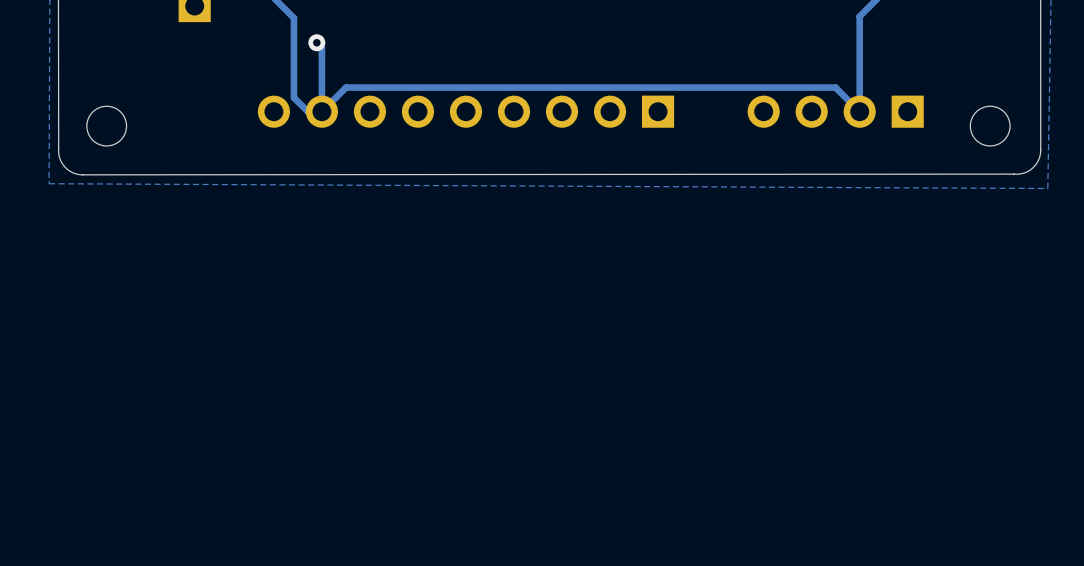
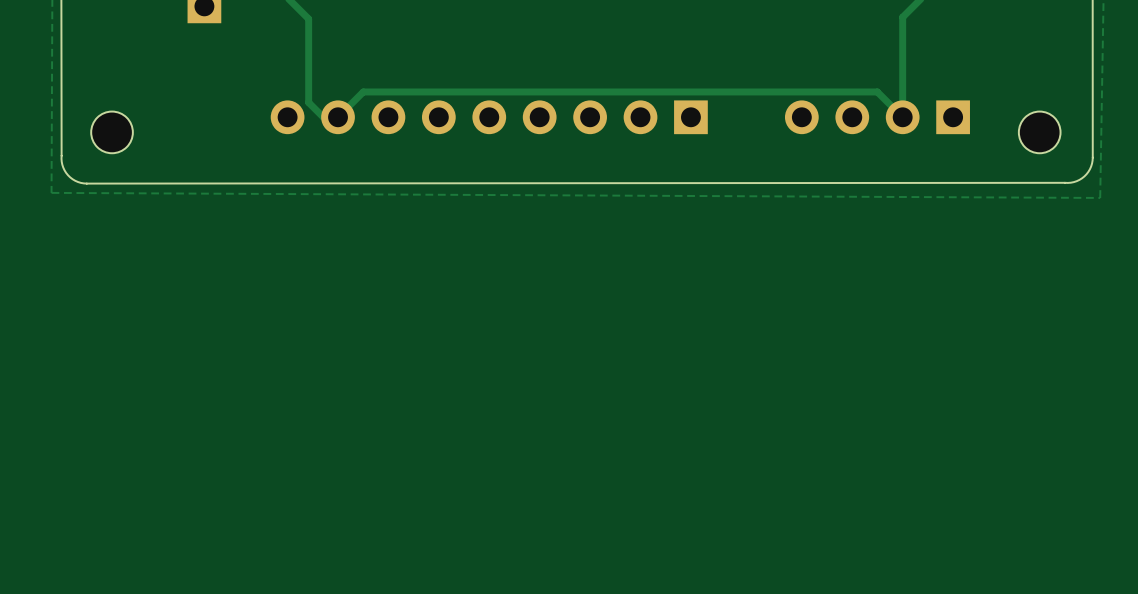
track: (316, 42) (321, 47) (321, 111) -> none
via: (316, 42) -> none

